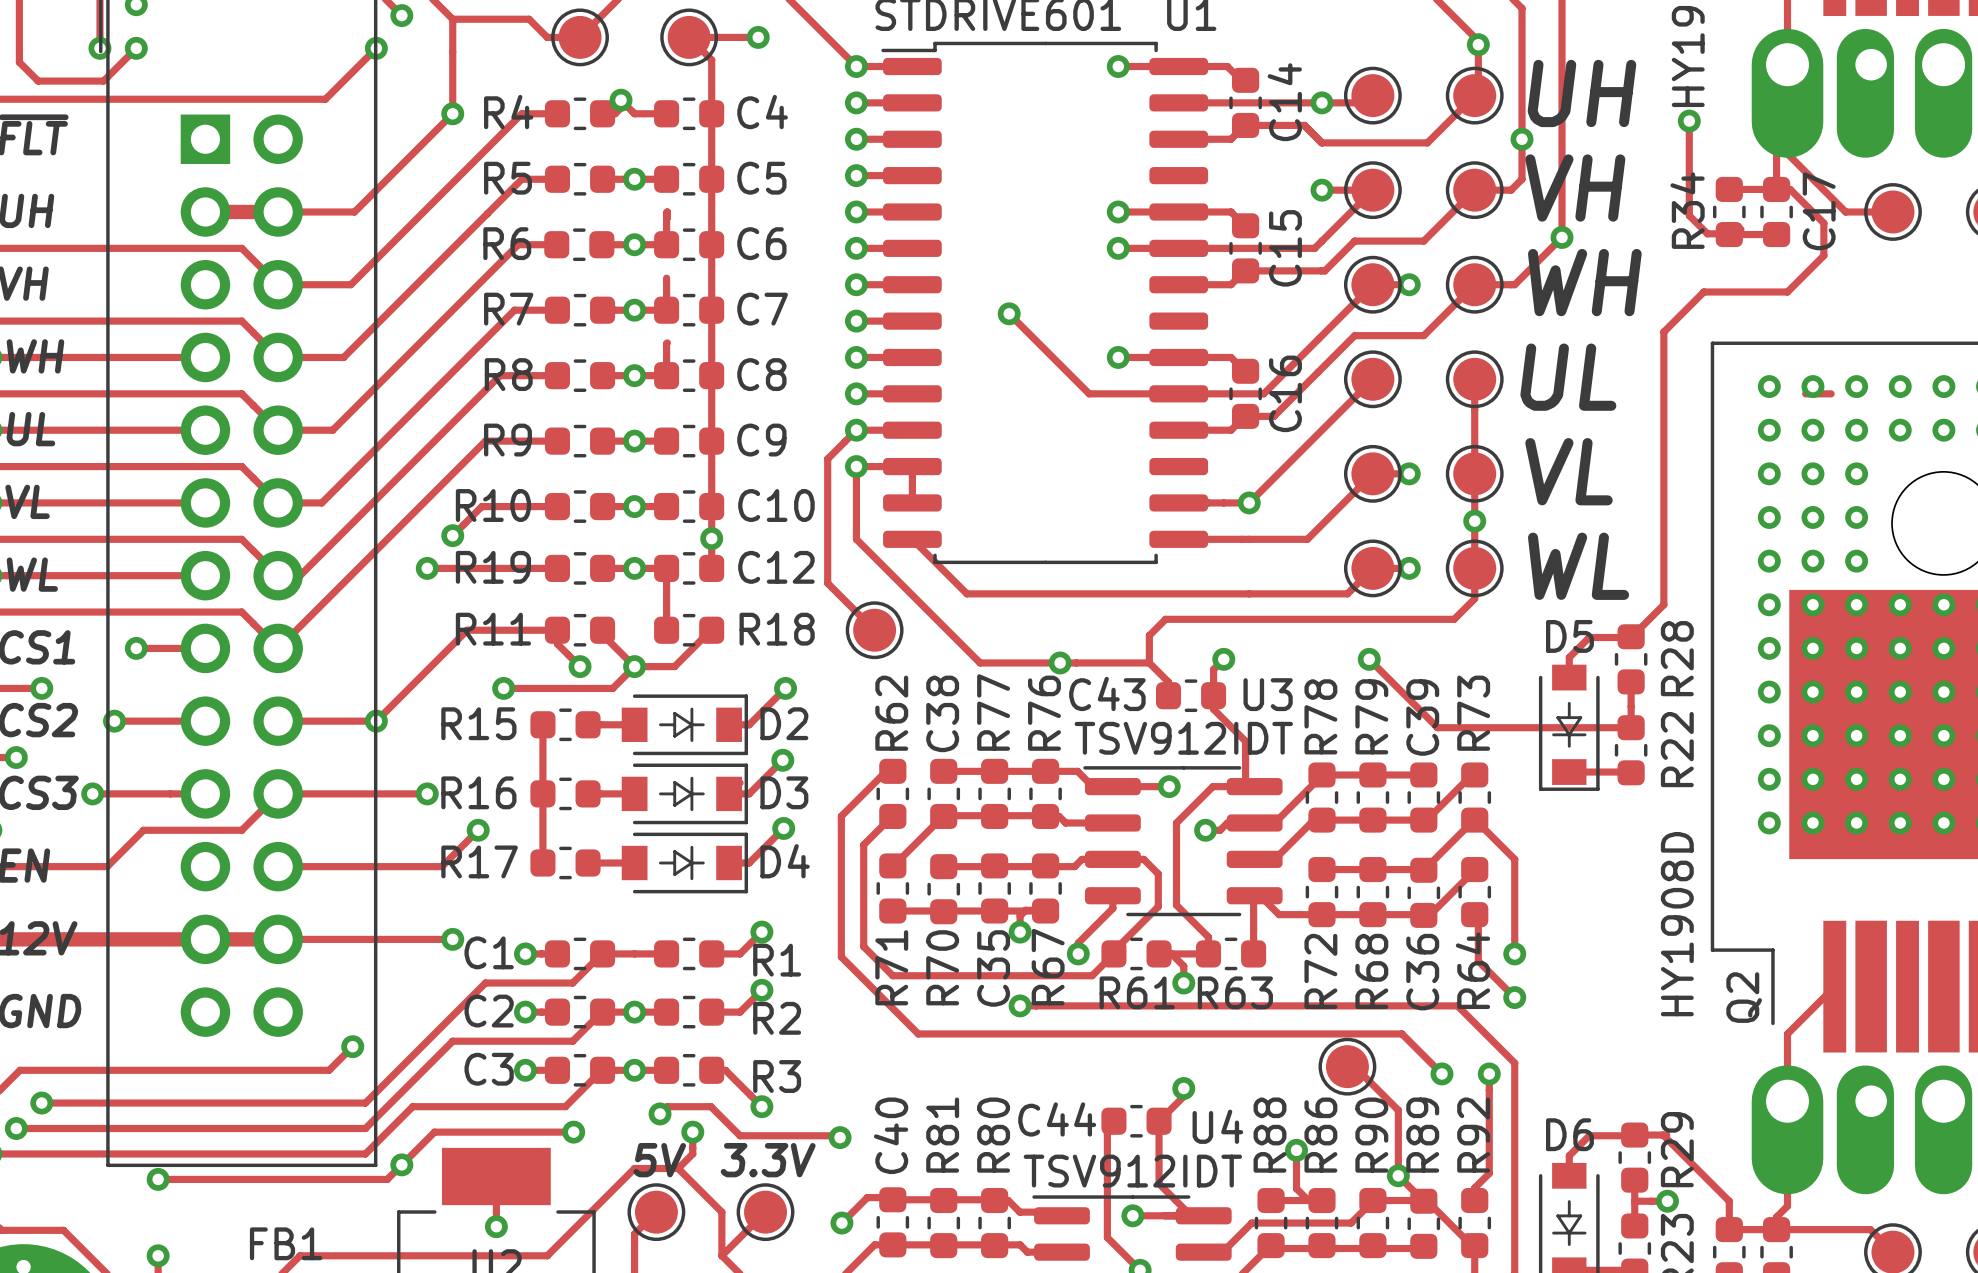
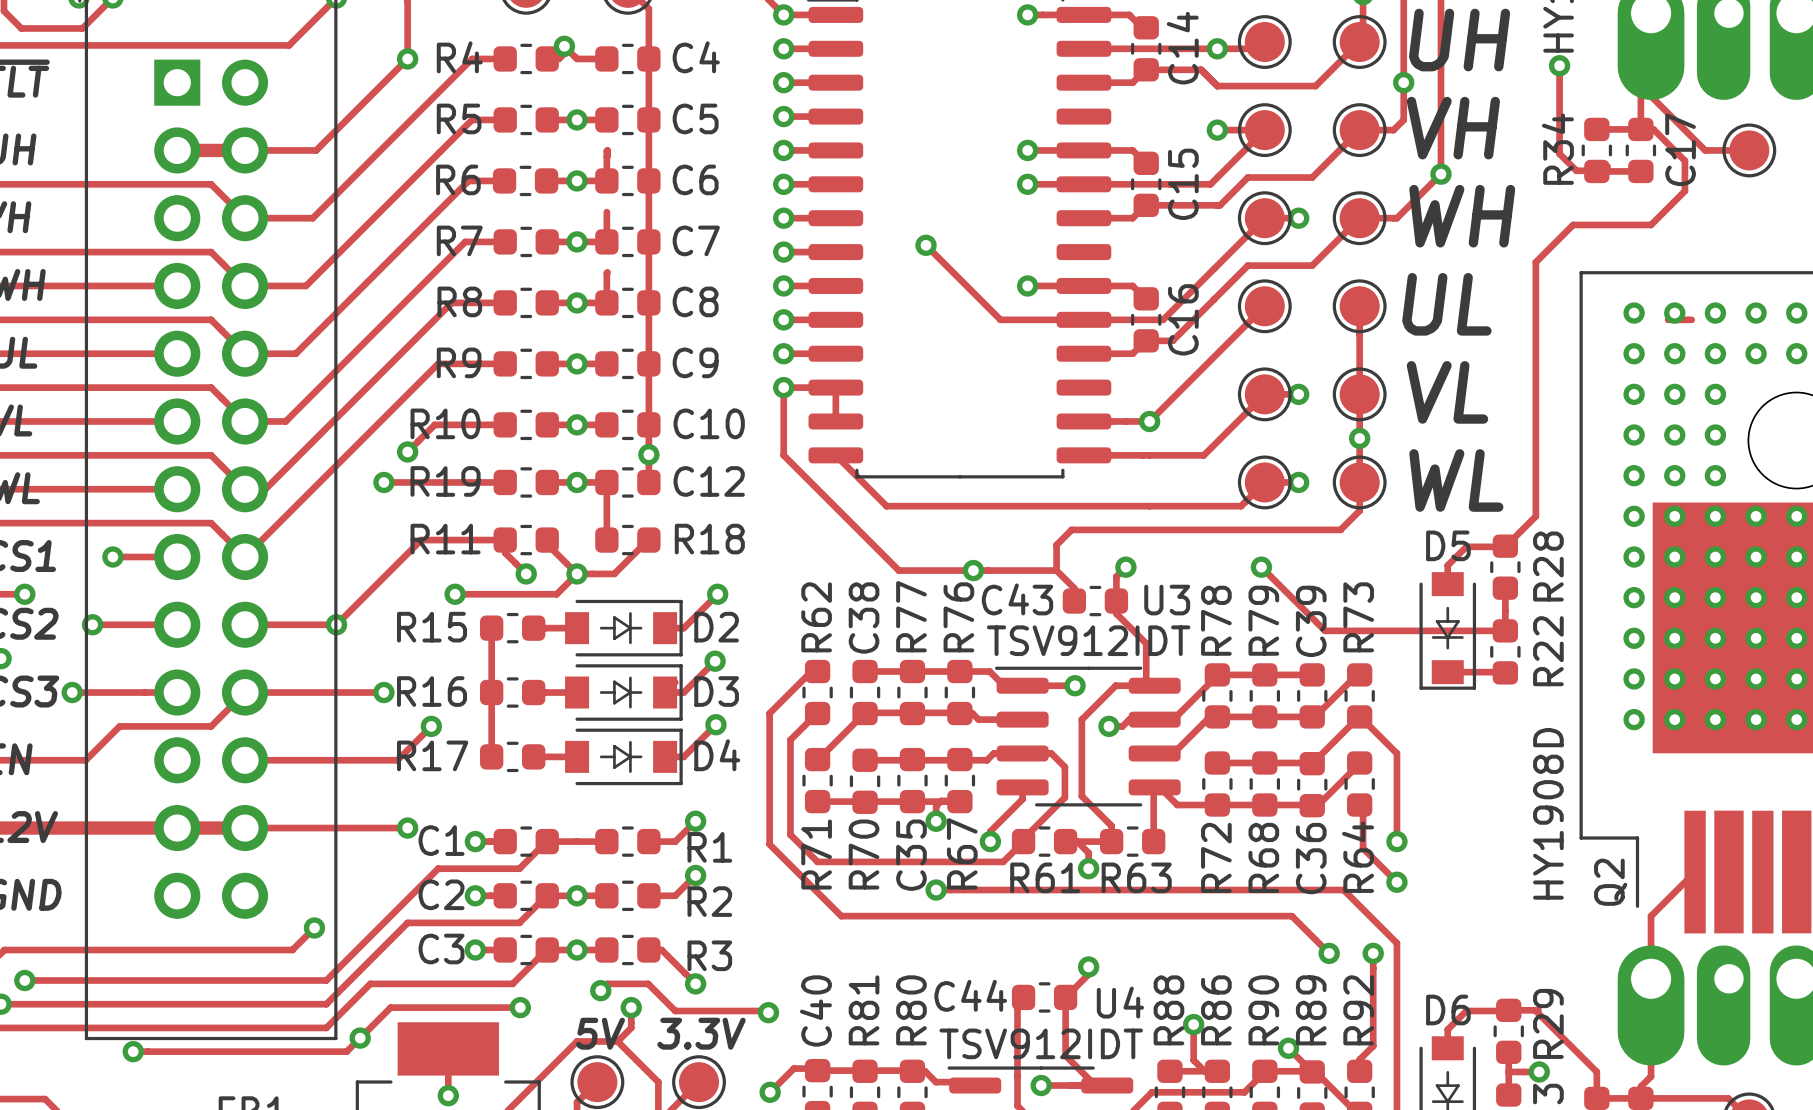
track: (856, 430) (827, 458) (827, 583) (874, 630) -> none
part: (874, 630) -> none
track: (1347, 1059) (1398, 1110) (1398, 1175) -> none
part: (1347, 1066) -> none

